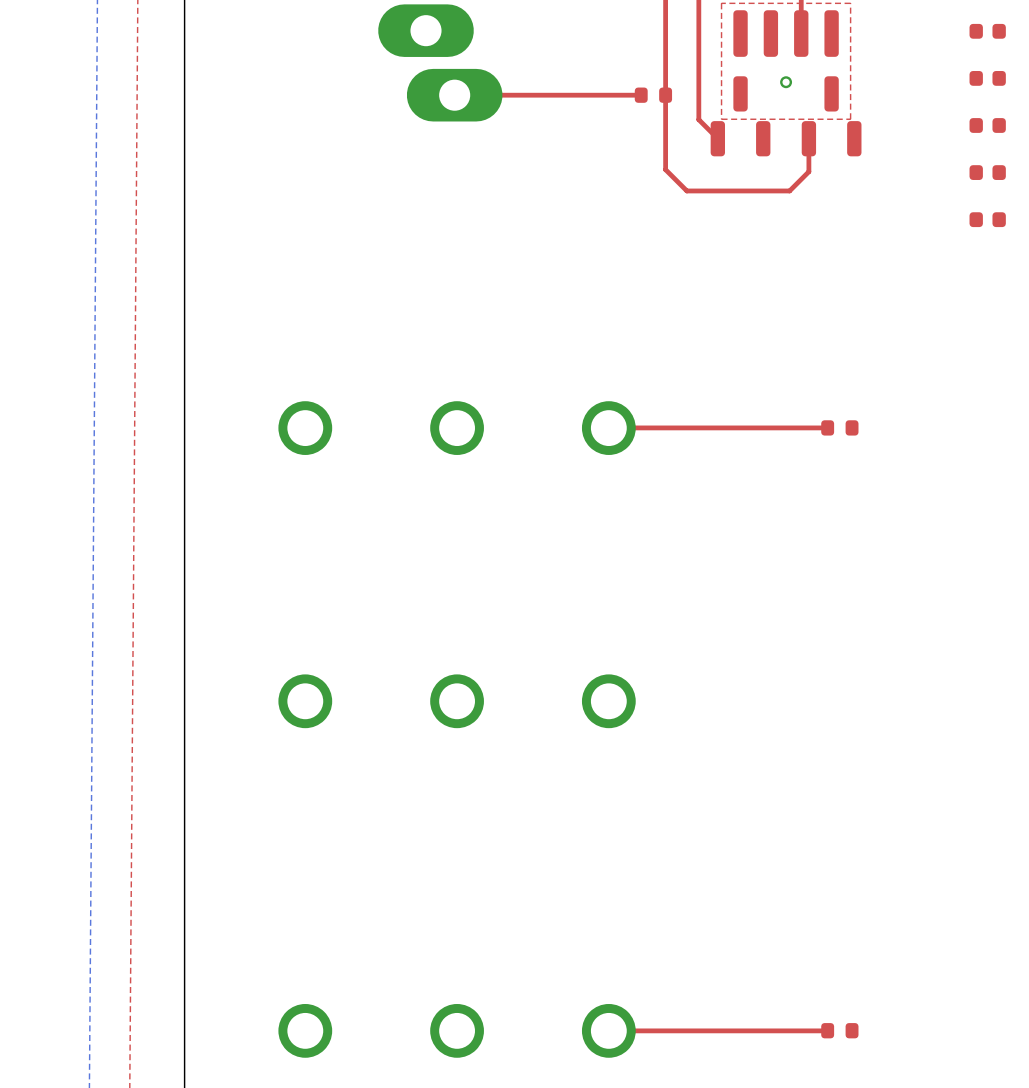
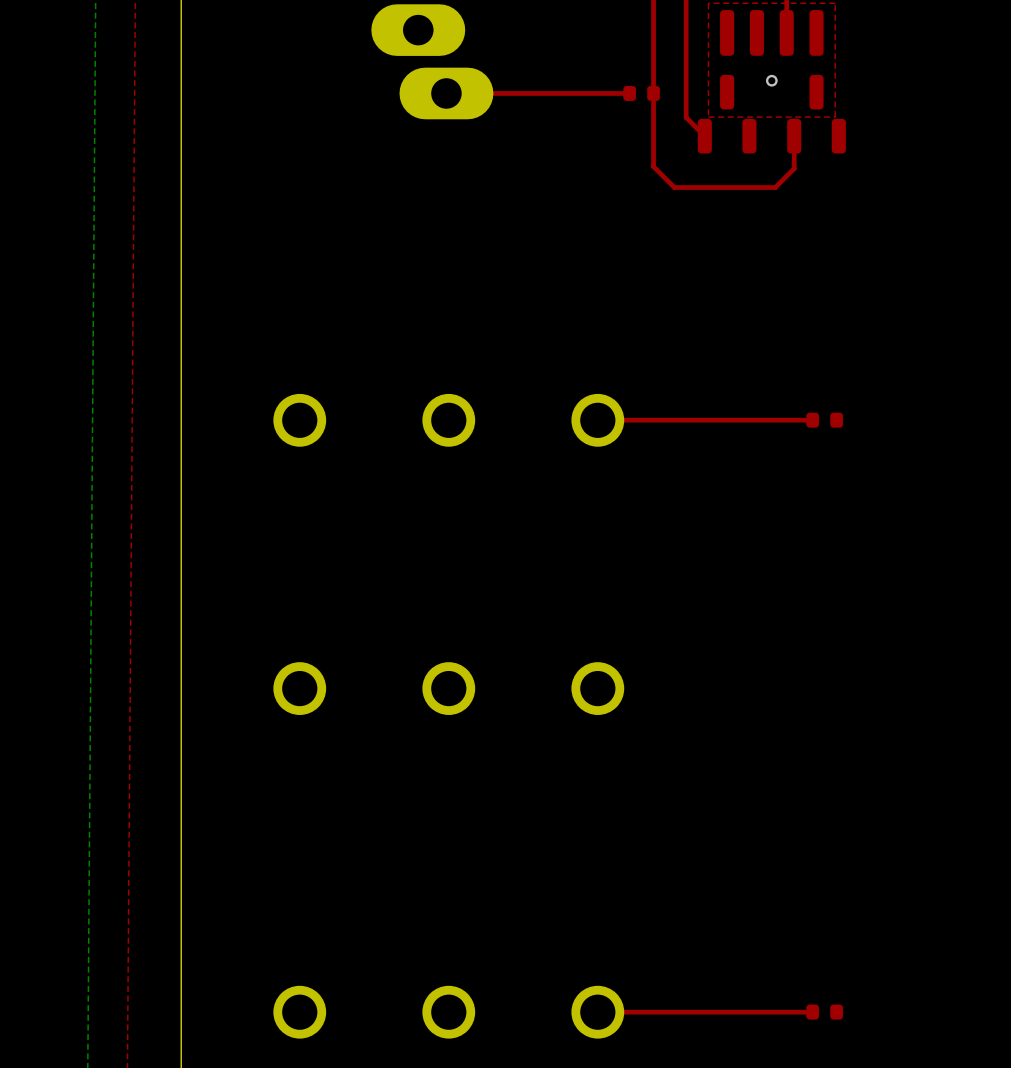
part: (987, 31) -> none
part: (987, 78) -> none
part: (987, 125) -> none
part: (987, 172) -> none
part: (987, 219) -> none

